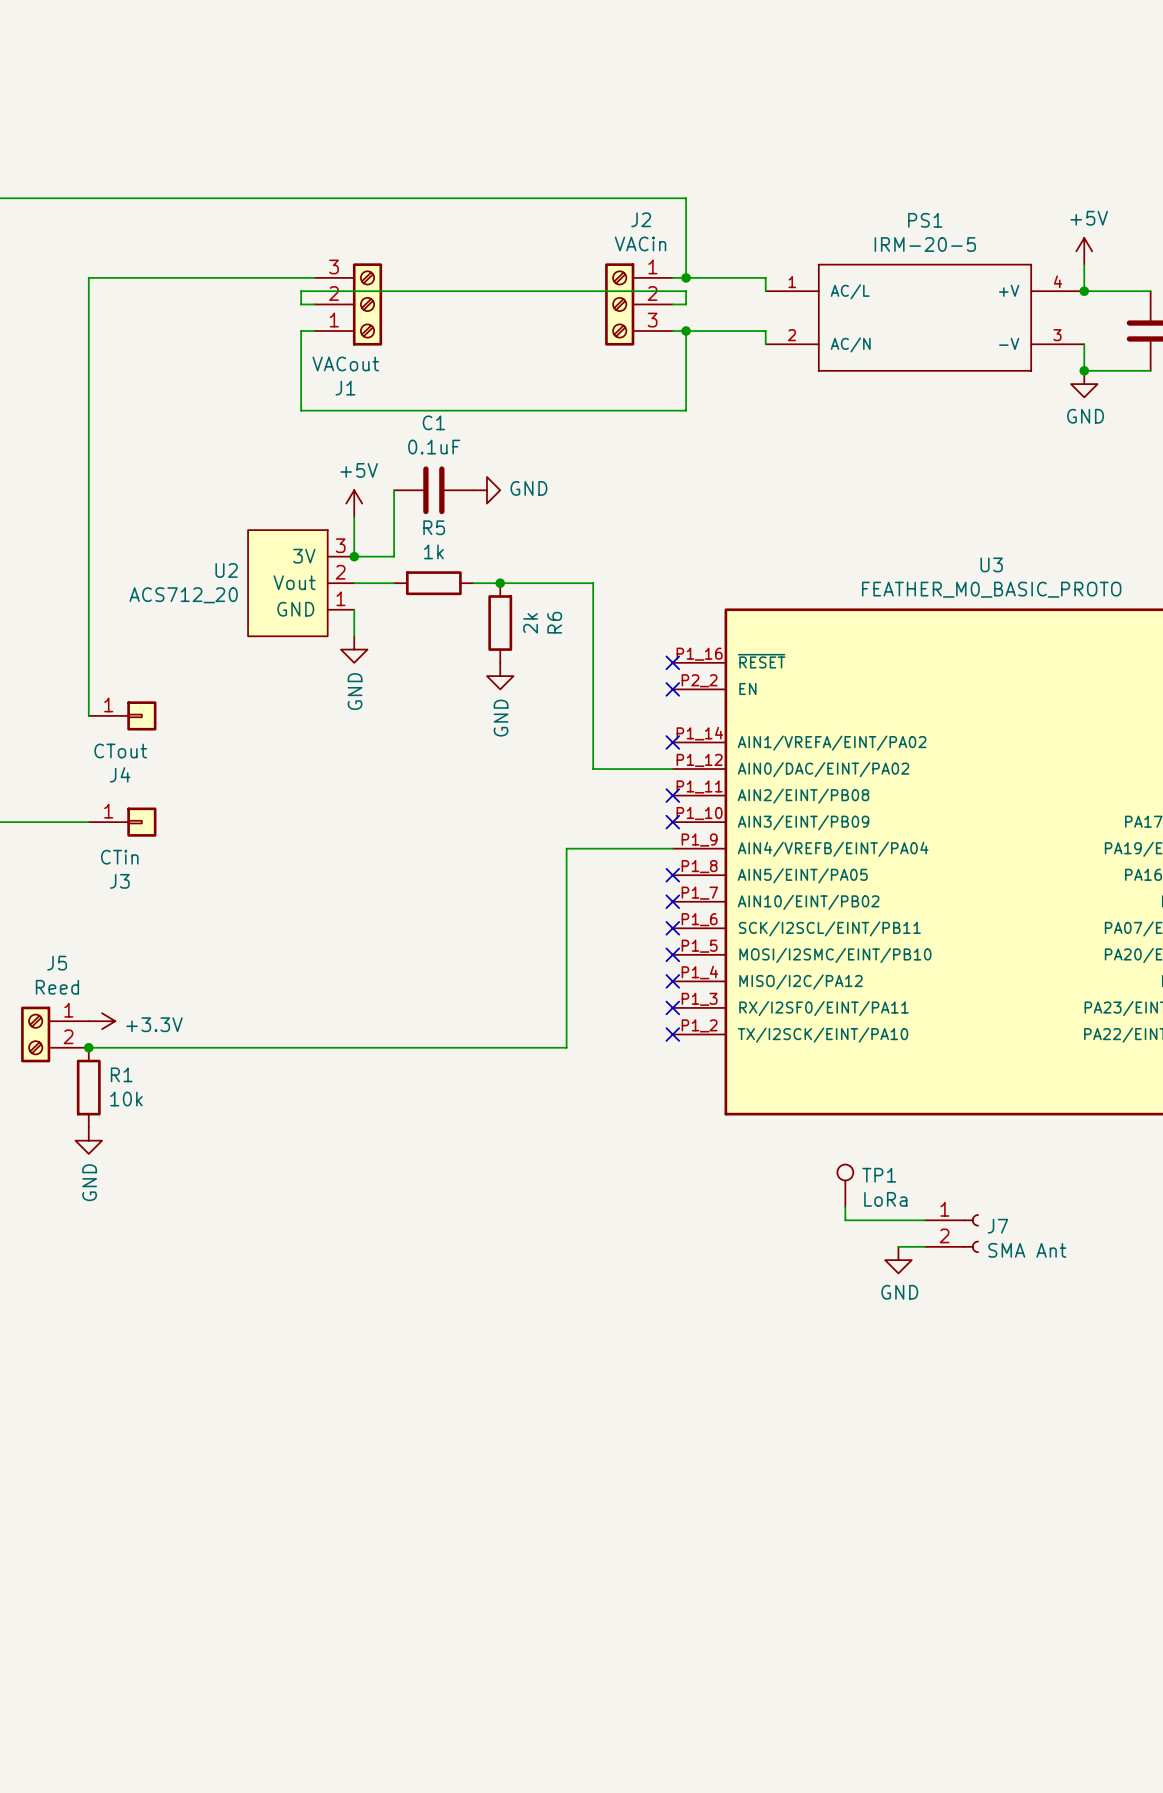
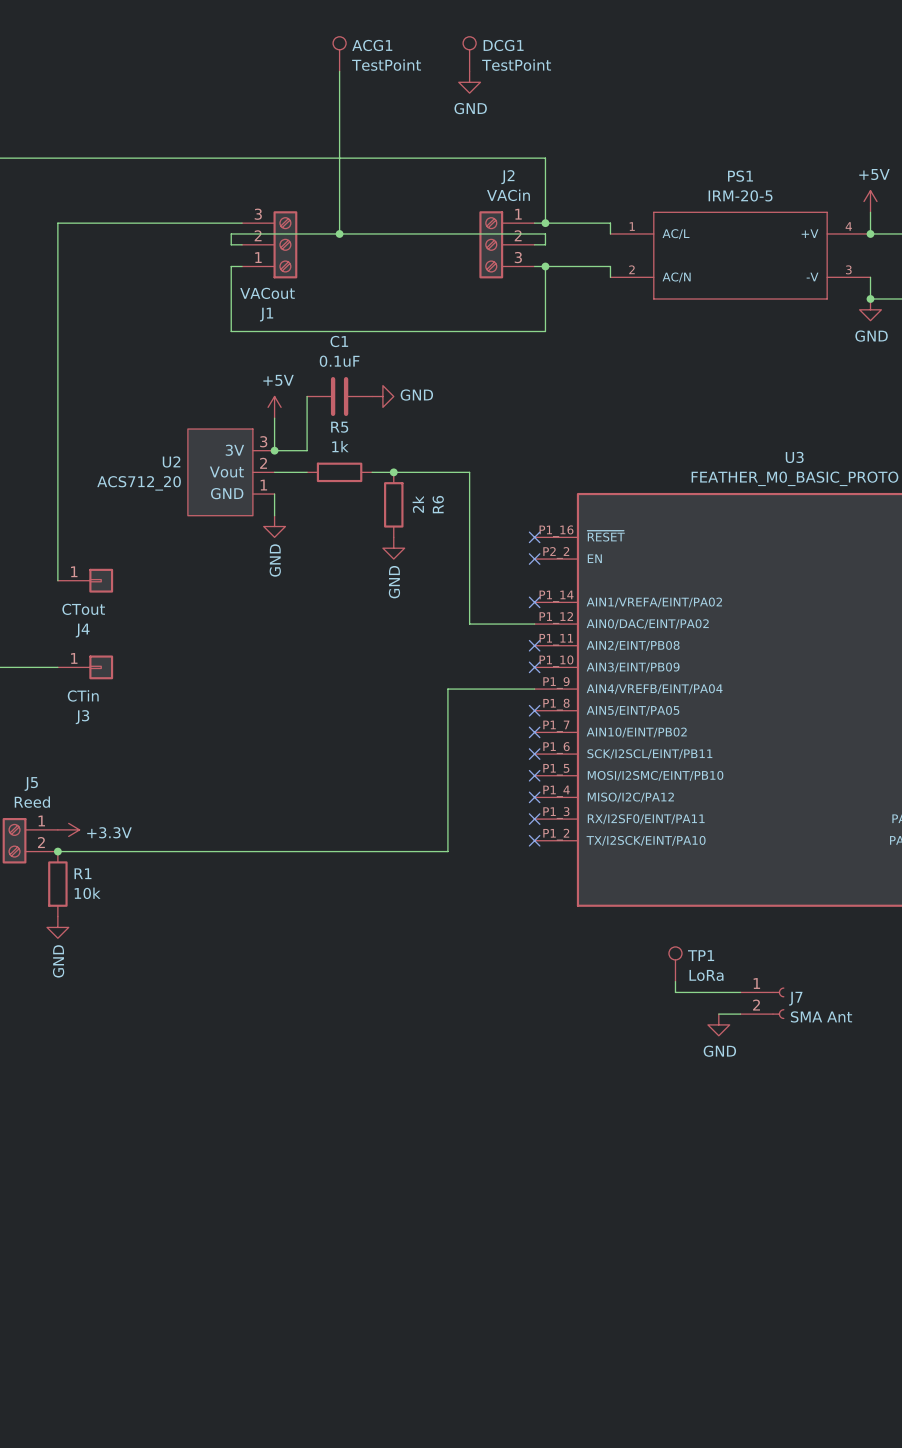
ACG1: none -> TestPoint (339, 54)
DCG1: none -> TestPoint (469, 54)
wire: none -> (339, 71) (339, 233)
power symbol: none -> GND (469, 82)
junction: none -> (339, 233)

